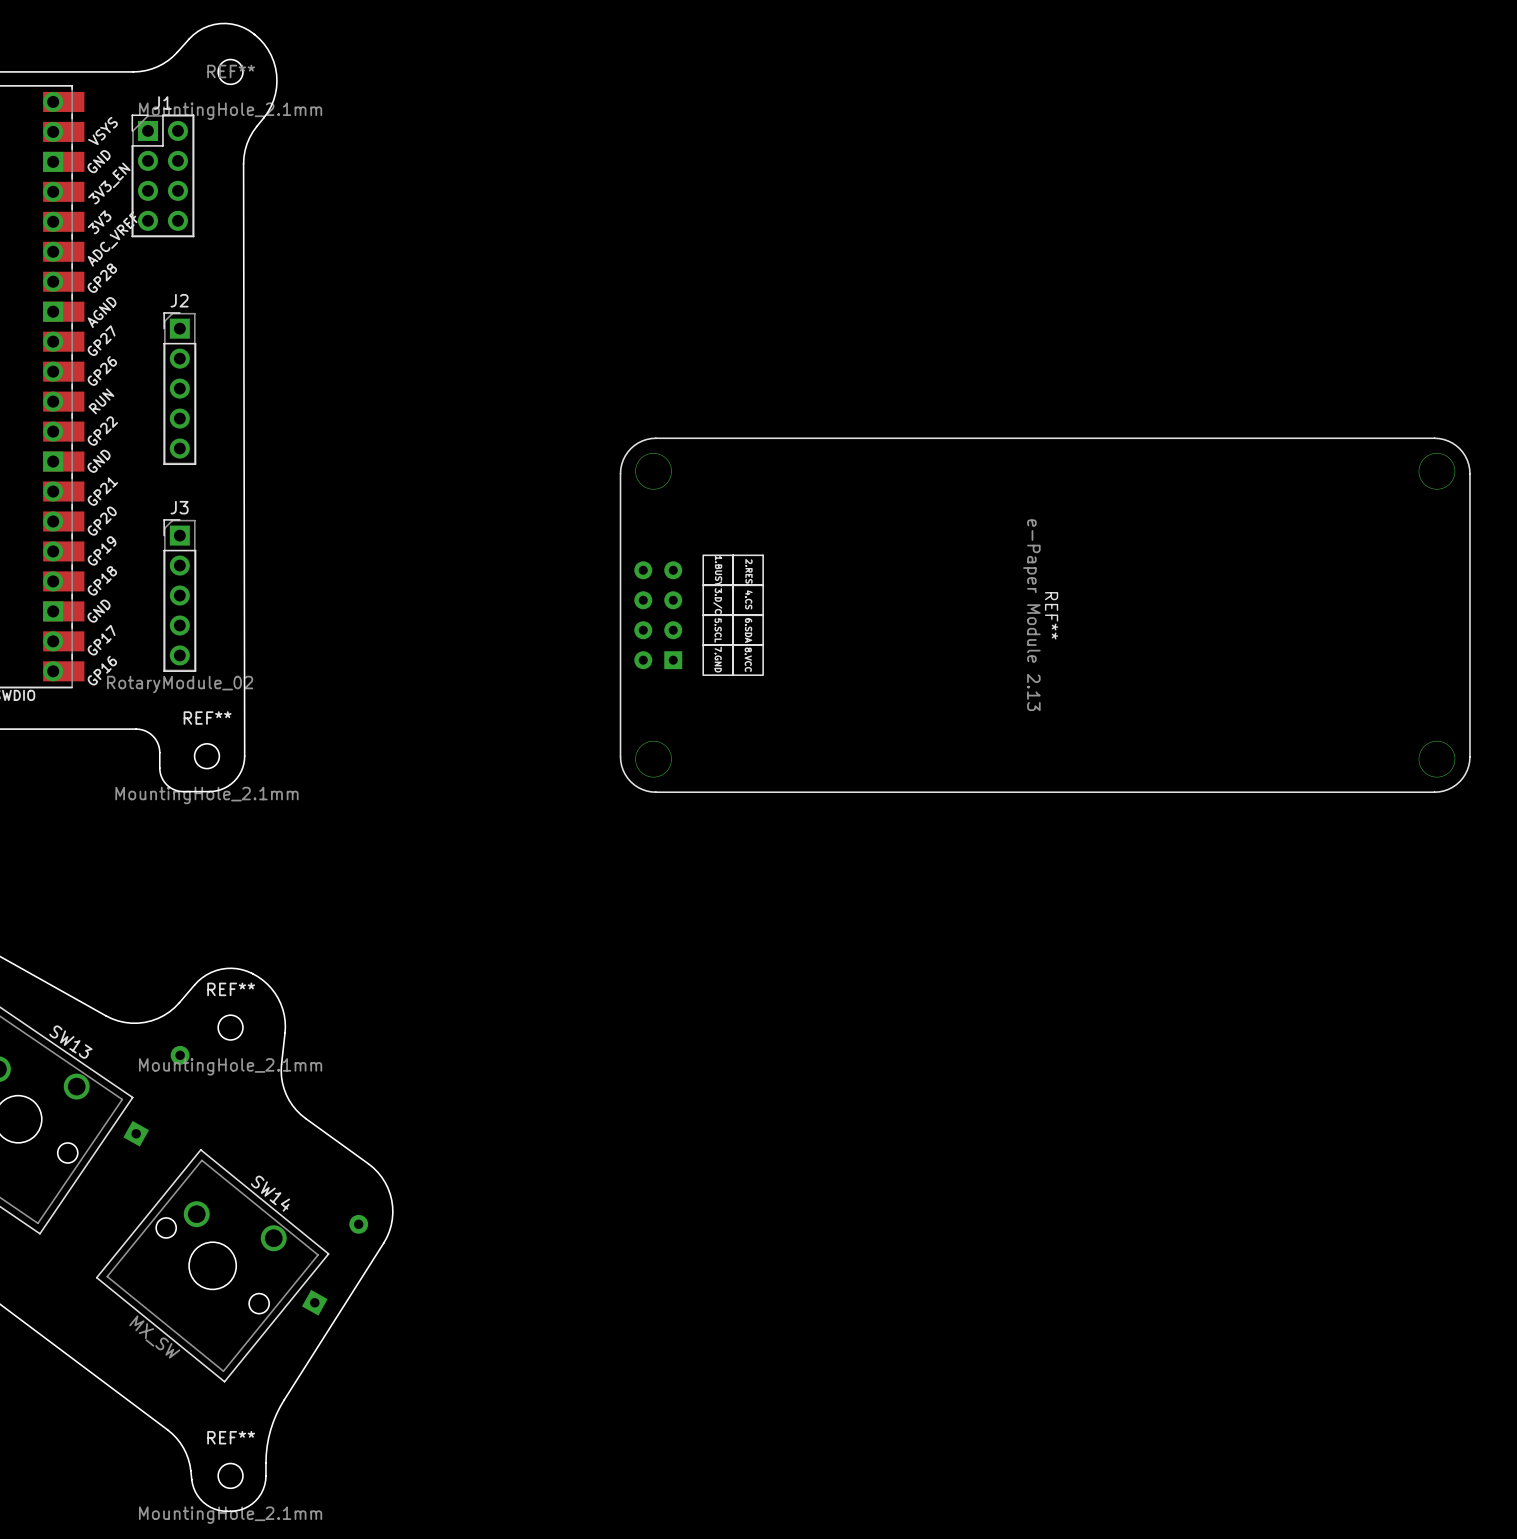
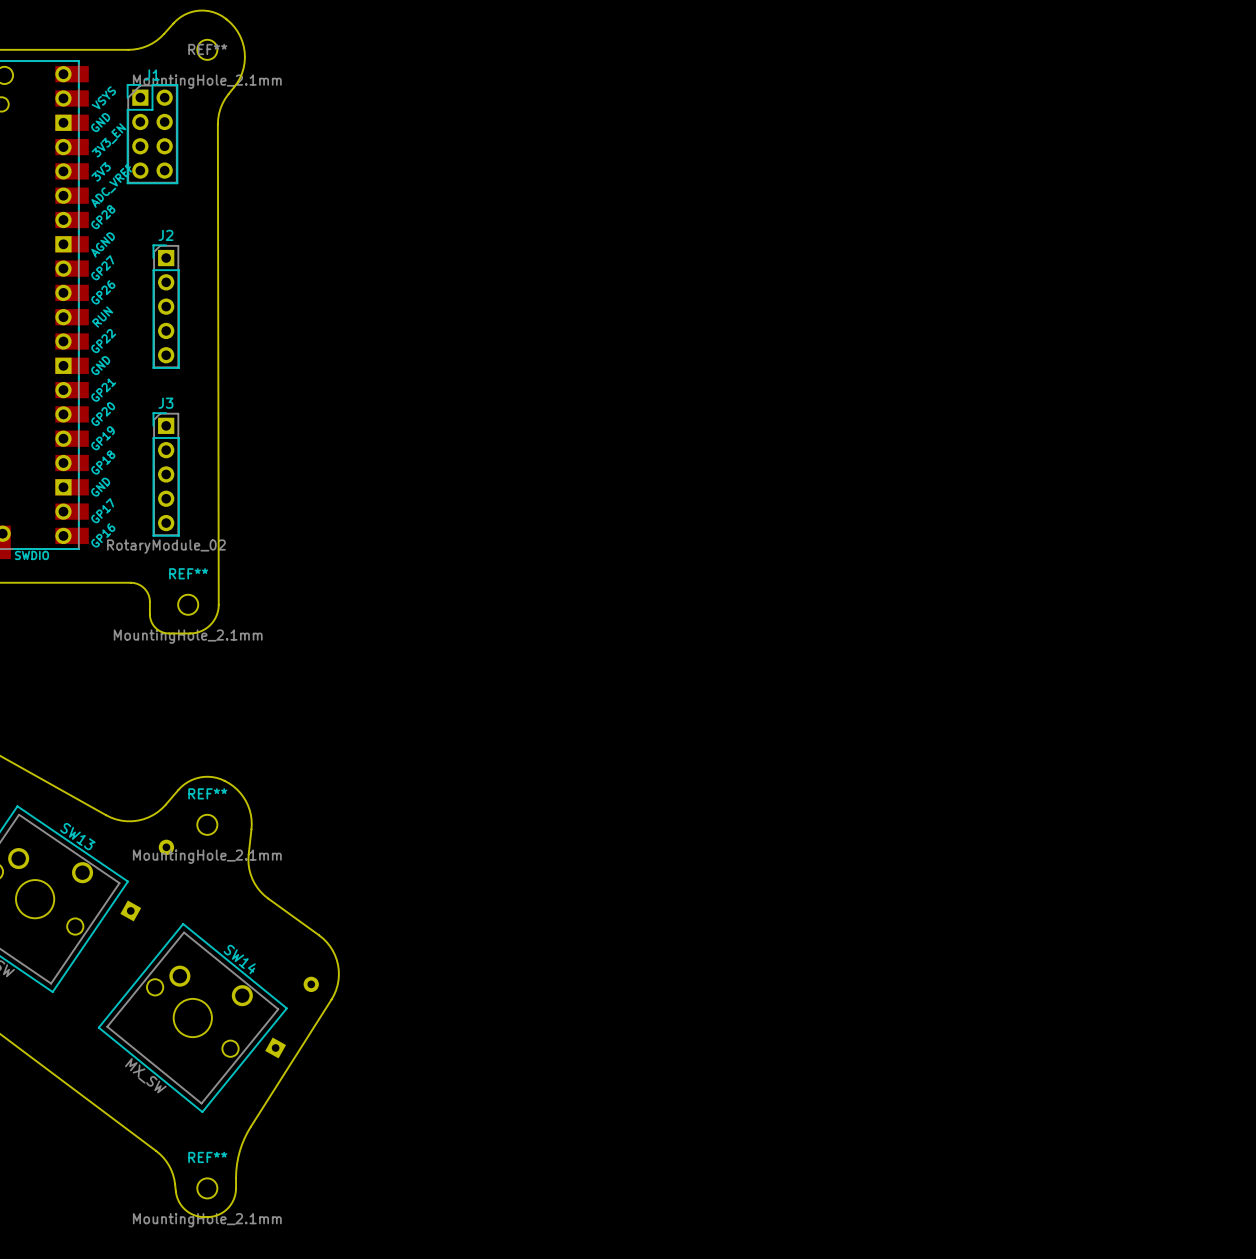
REF**: e-Paper Module 2.13 (1045, 615) -> none

